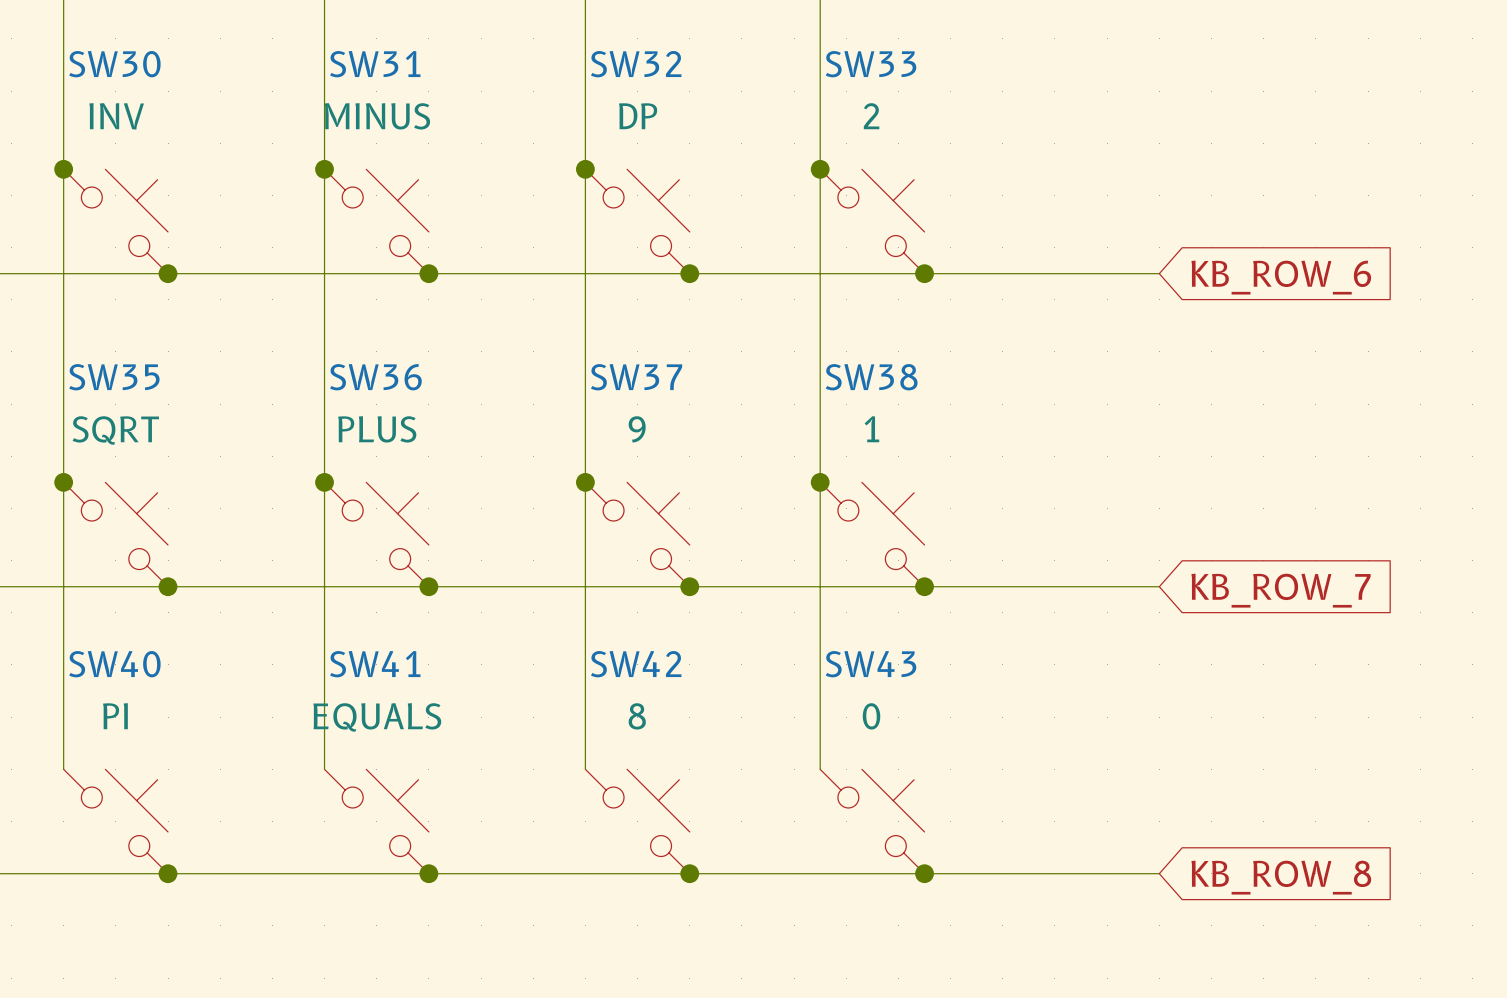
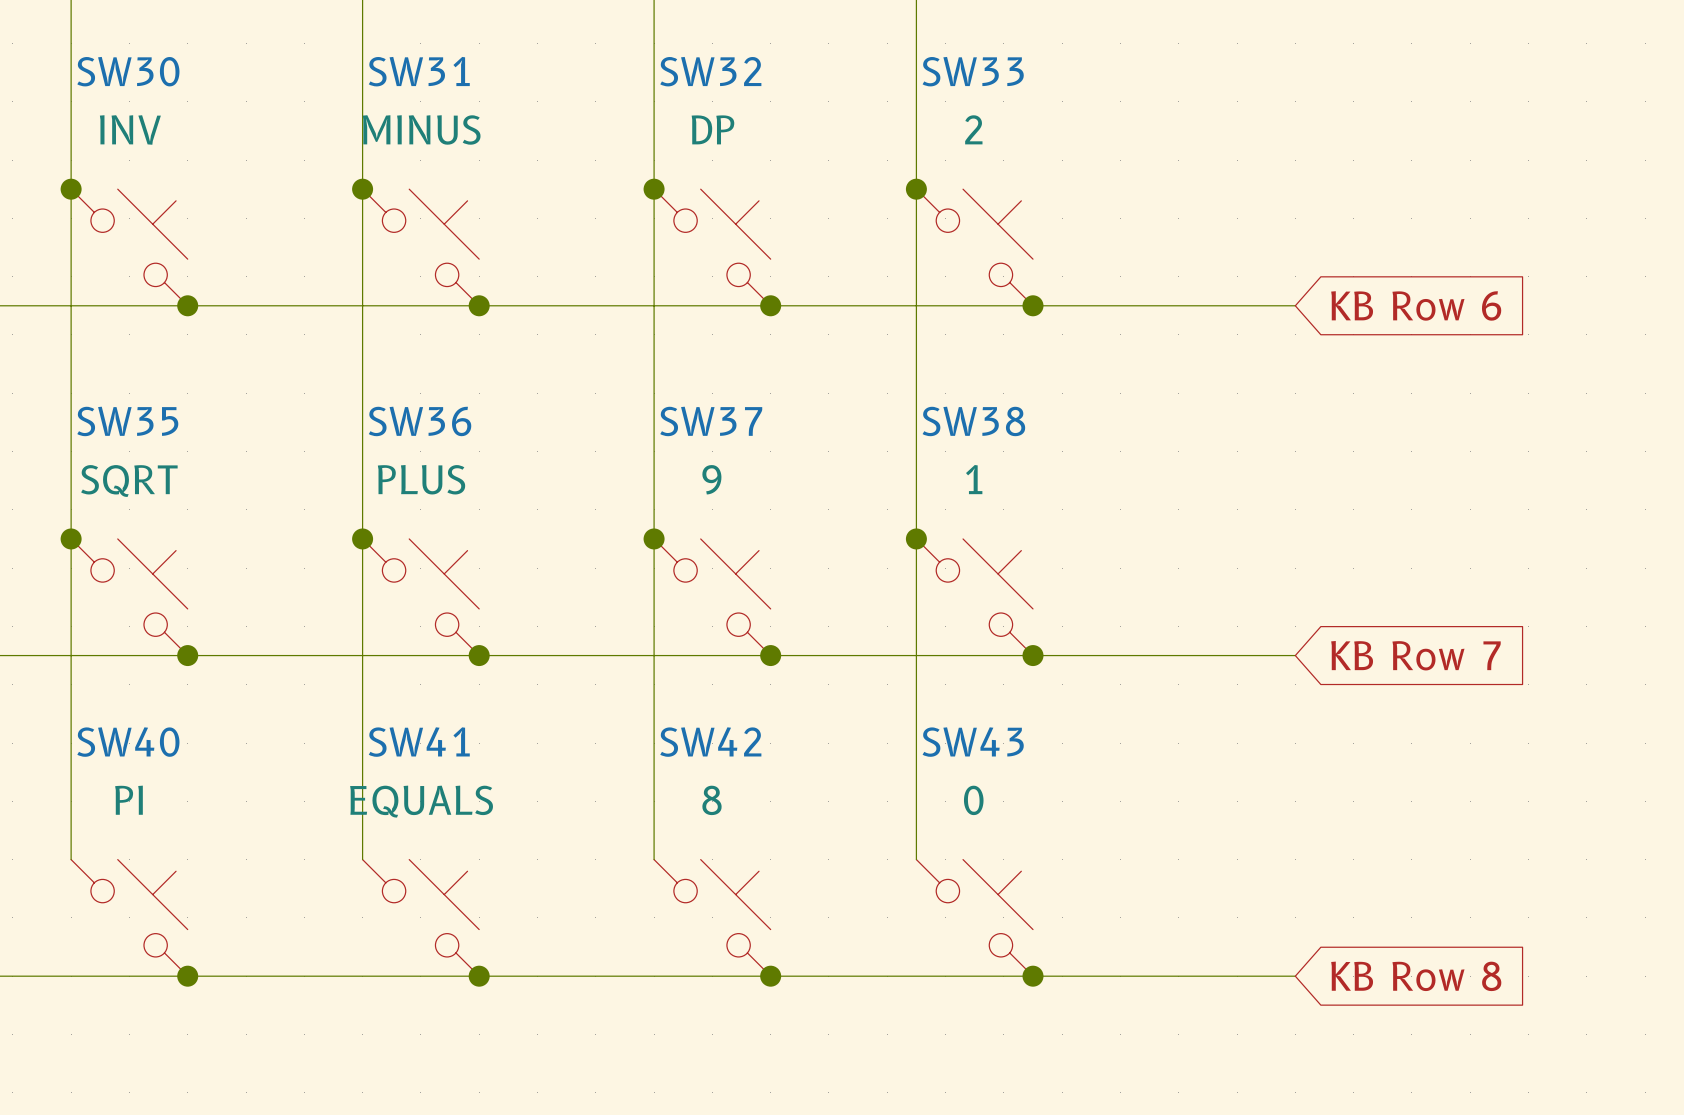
global label: KB_ROW_6 (1281, 277) -> KB Row 6 (1416, 305)
global label: KB_ROW_7 (1281, 590) -> KB Row 7 (1415, 655)
global label: KB_ROW_8 (1281, 877) -> KB Row 8 (1416, 976)

